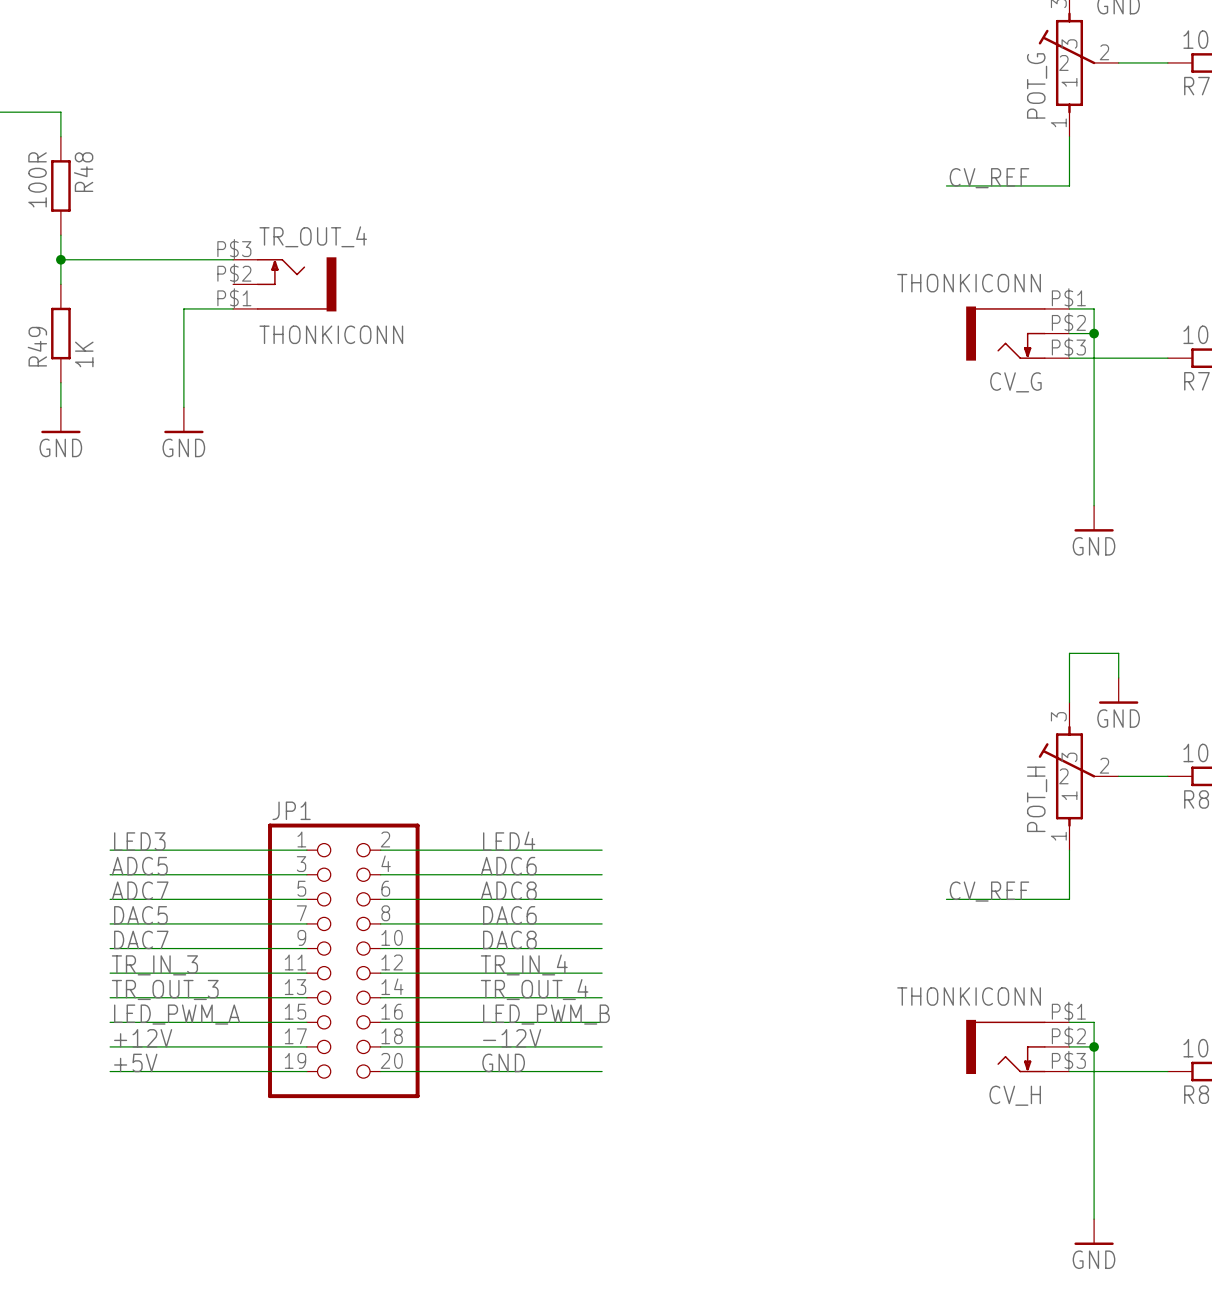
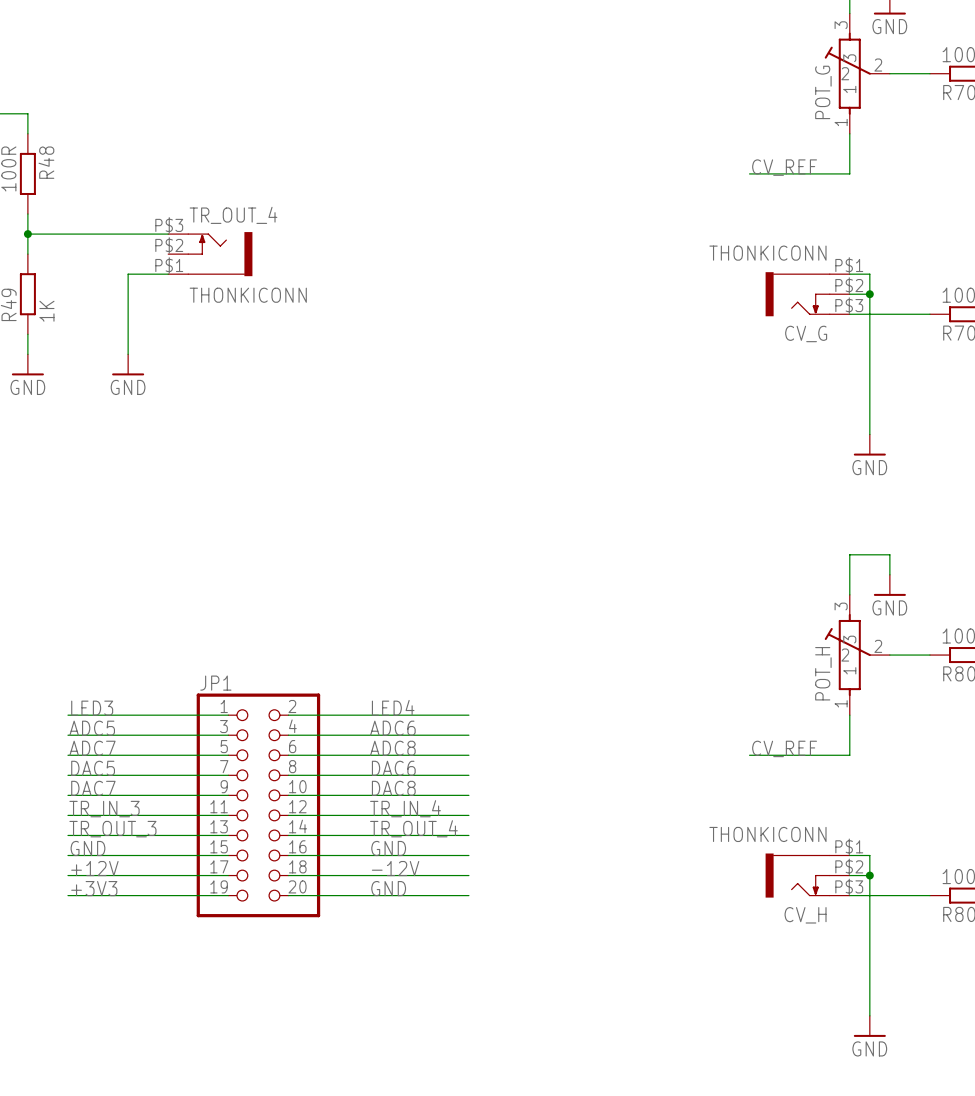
label: LED_PWM_A (177, 1014) -> GND (87, 848)
label: LED_PWM_B (546, 1014) -> GND (388, 848)
label: +5V (135, 1062) -> +3V3 (94, 888)

